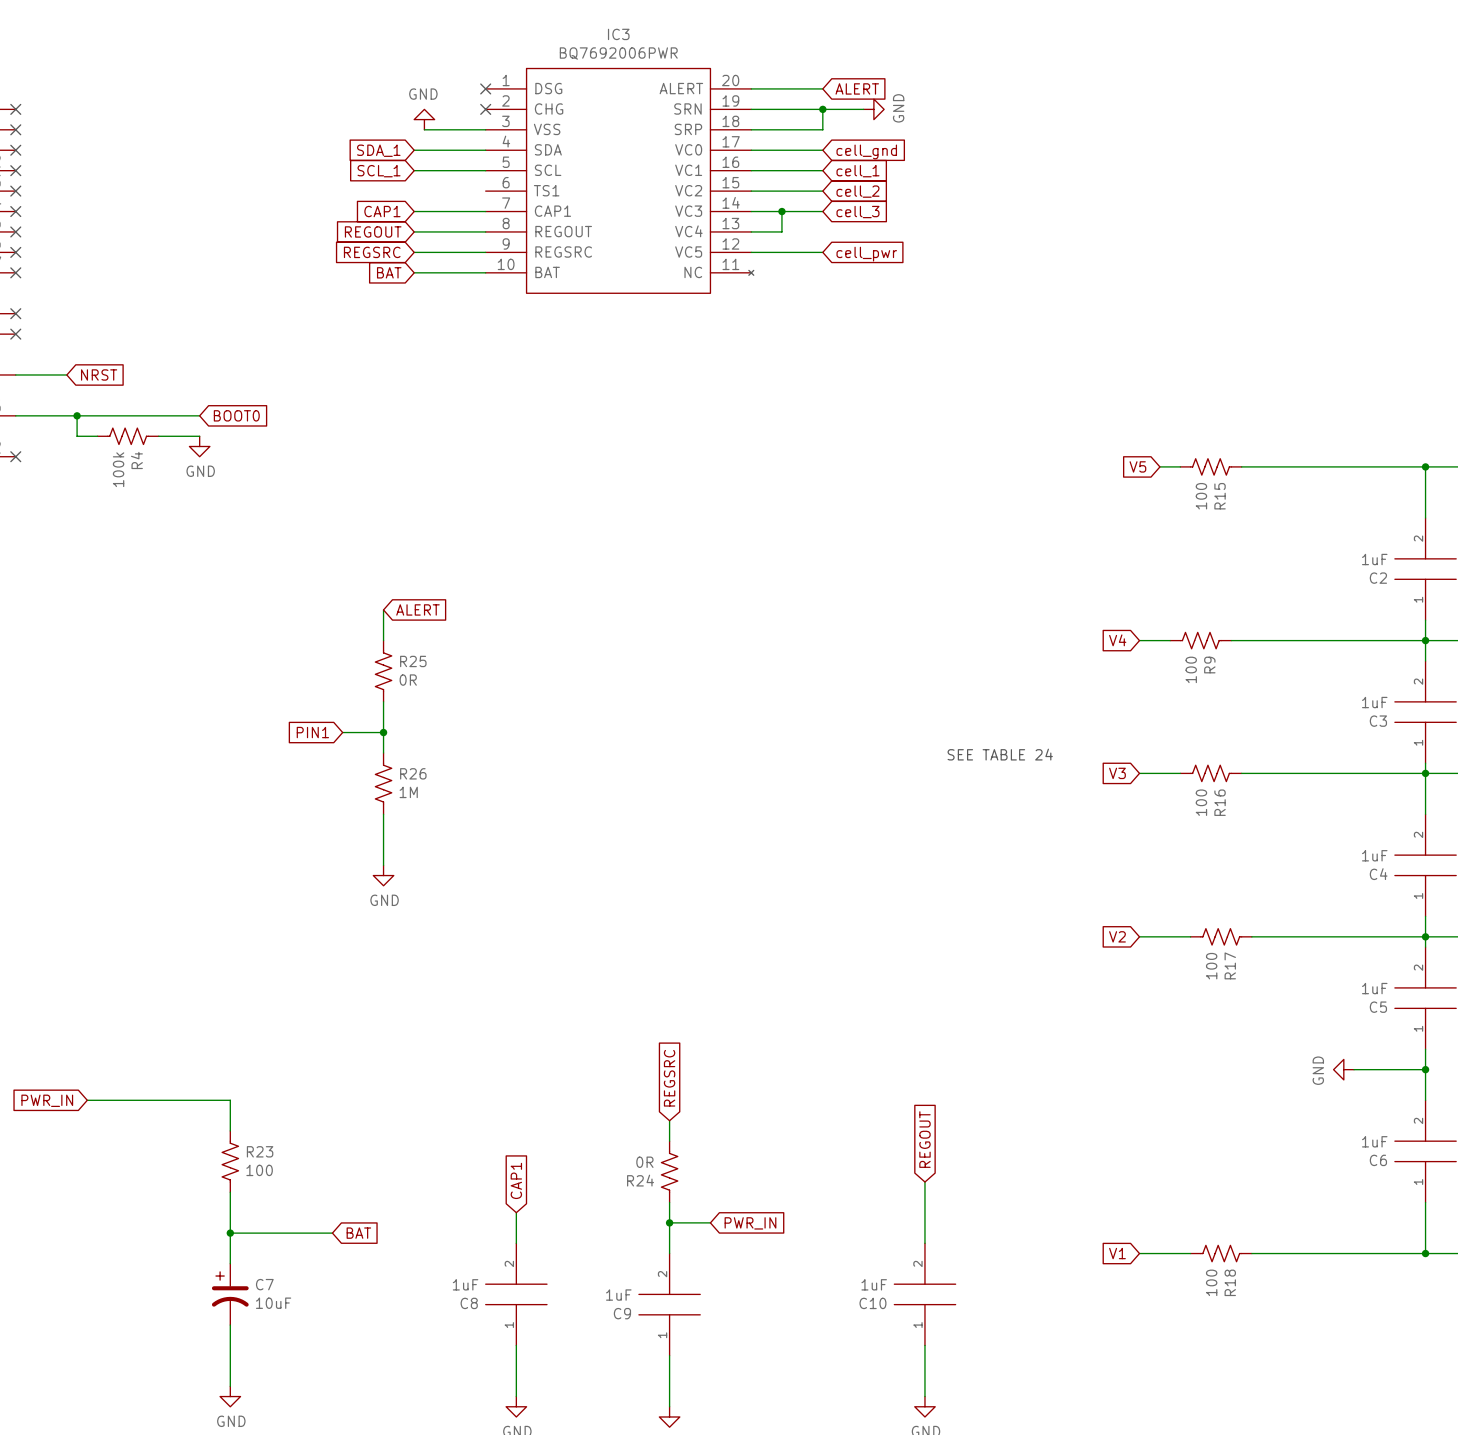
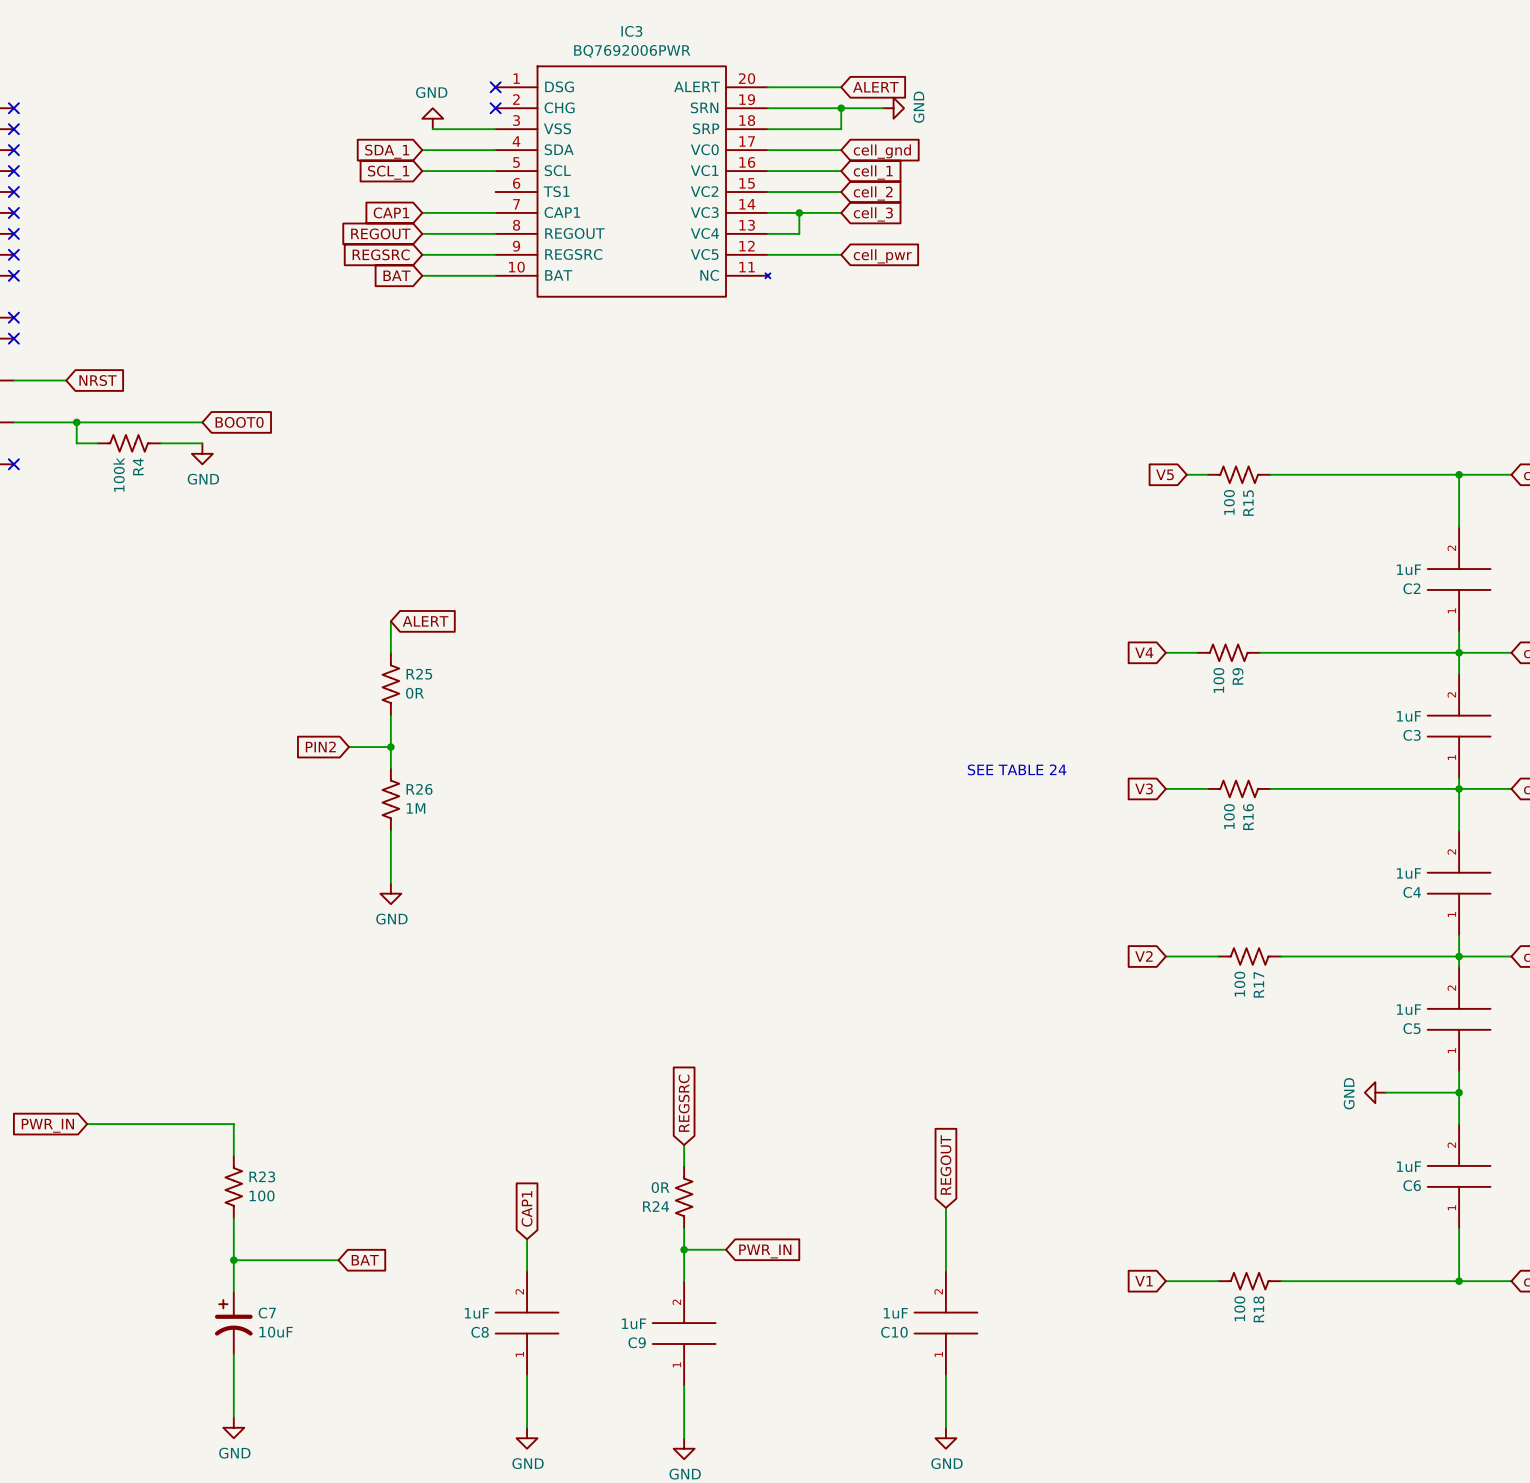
global label: PIN1 (312, 732) -> PIN2 (320, 746)

